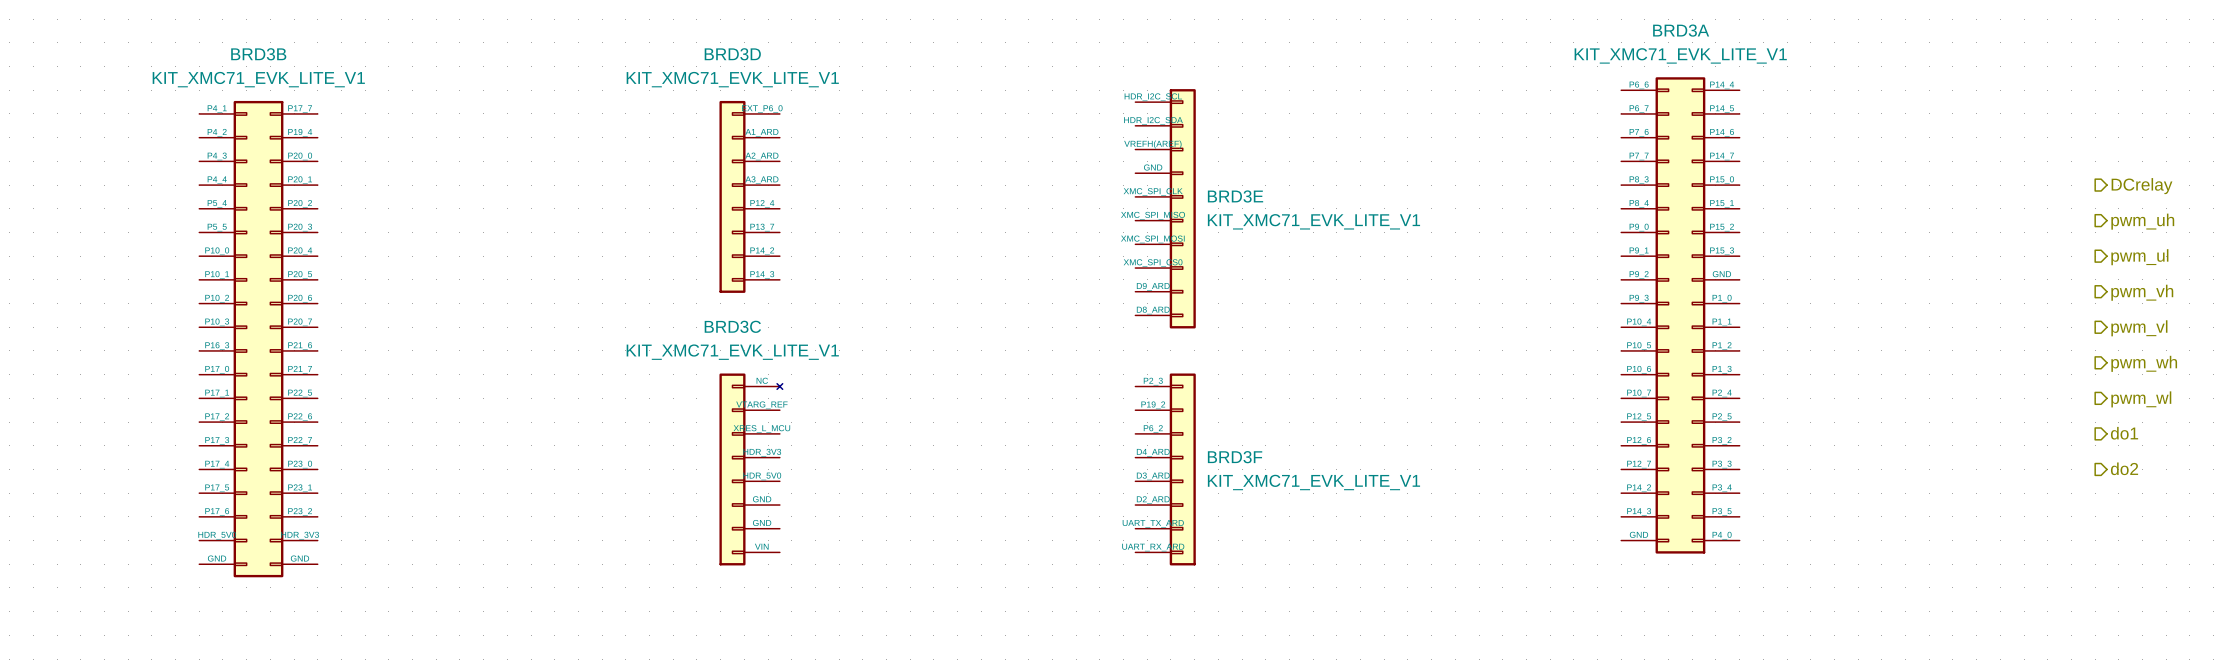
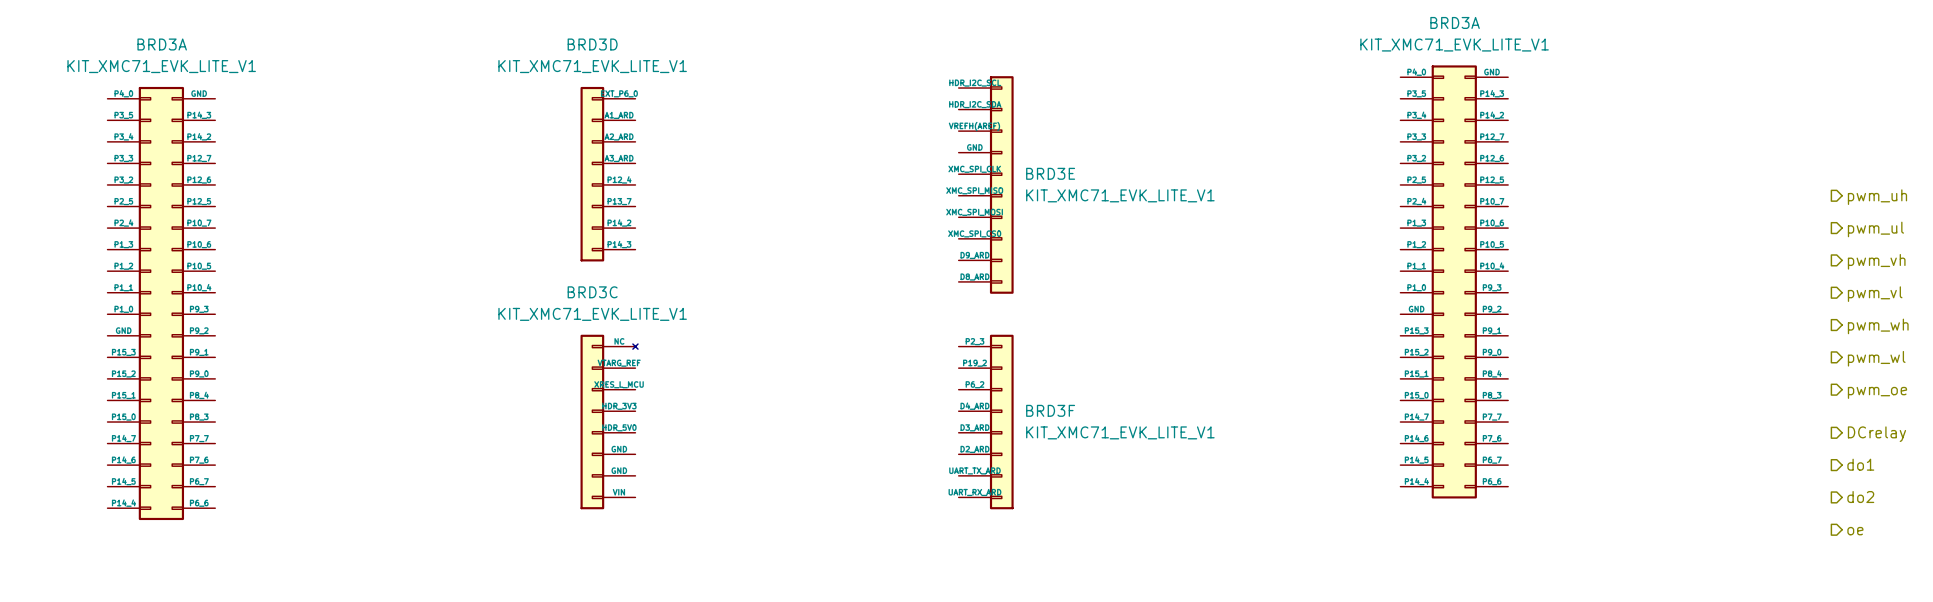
BRD3B name: BRD3B (258, 54) -> BRD3A (162, 44)
BRD3B symbol: [199, 100, 318, 578] -> [107, 86, 216, 521]
hierarchical label: DCrelay (2142, 186) -> none
BRD3A rotation: 0° (1680, 315) -> 180° (1454, 281)
hierarchical label: do1 (2124, 433) -> pwm_oe (1877, 392)
hierarchical label position: do2 (2124, 468) -> do2 (1860, 497)
hierarchical label: none -> DCrelay (1876, 434)
hierarchical label: none -> do1 (1860, 464)
hierarchical label: none -> oe (1855, 531)

